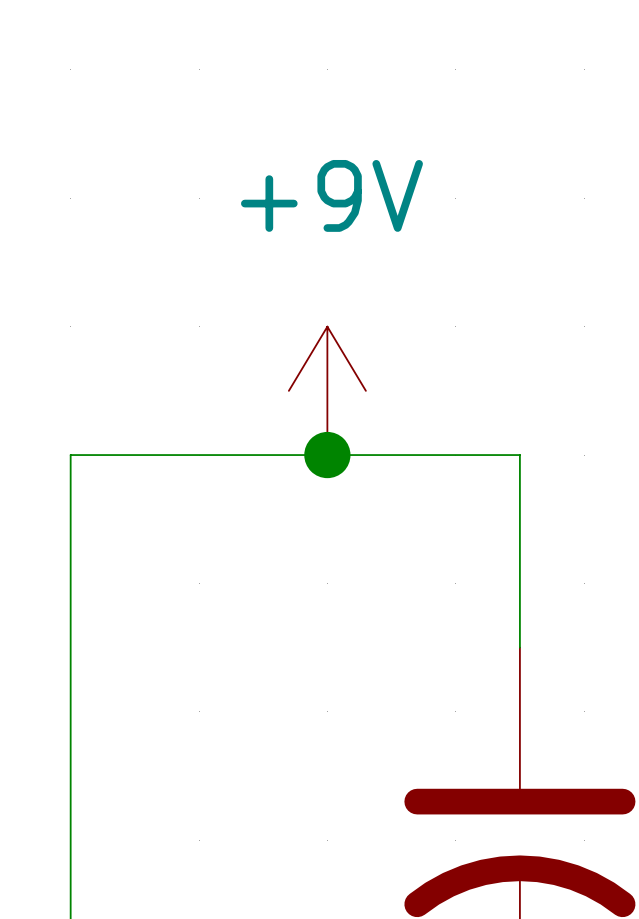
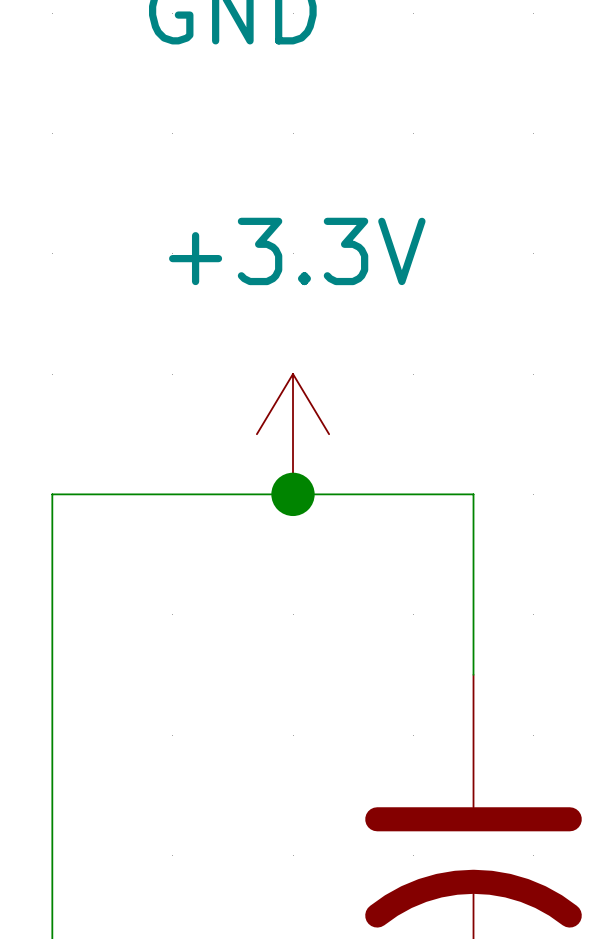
power symbol: +9V (327, 390) -> +3.3V (293, 434)

